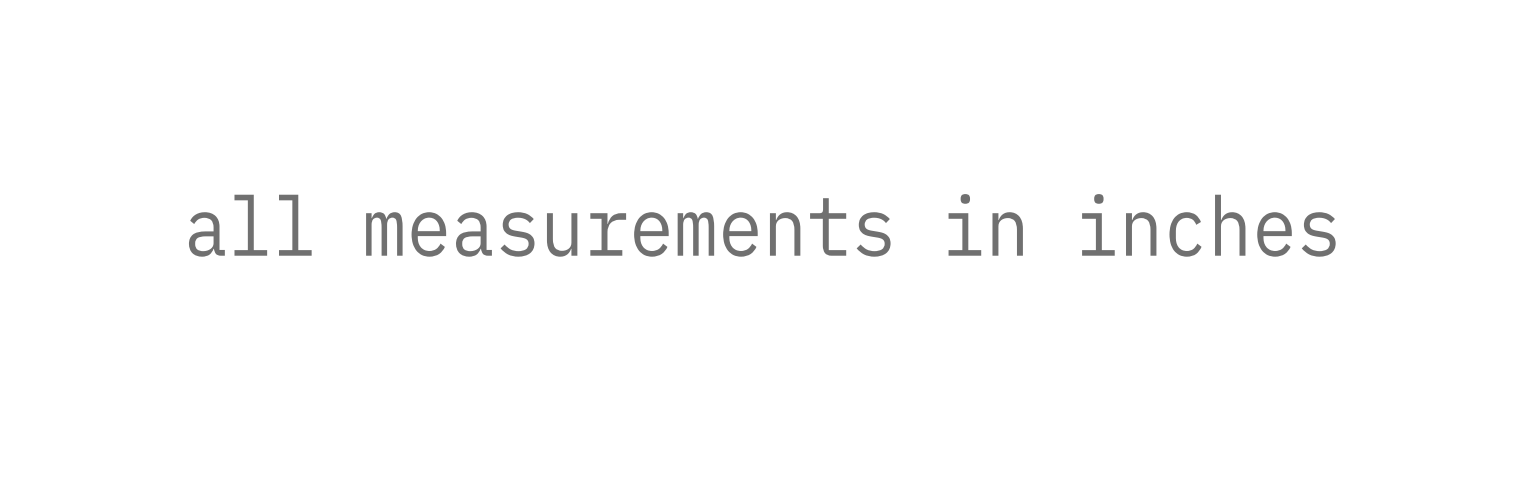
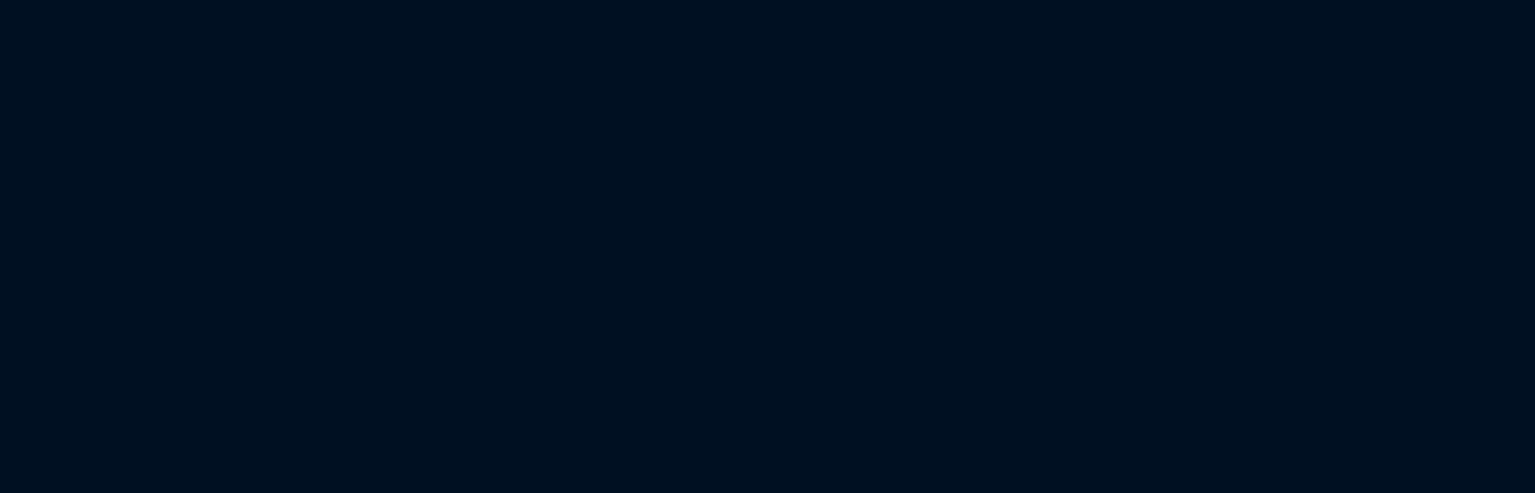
text: all measurements in inches (762, 225) -> none

